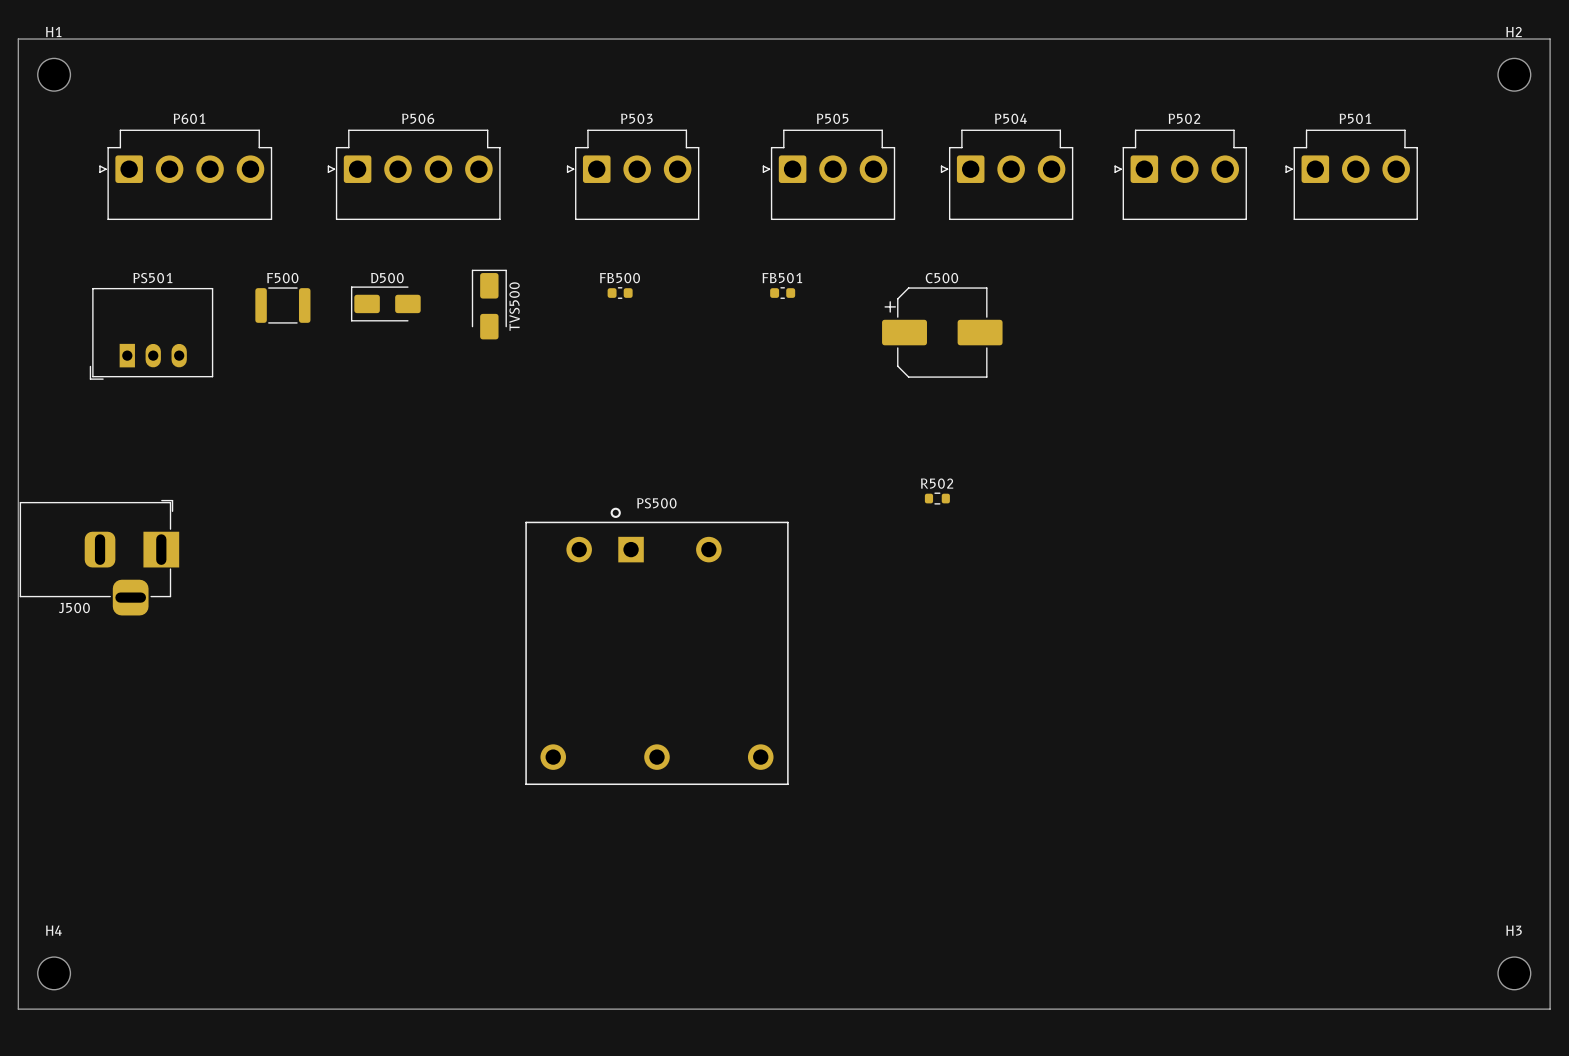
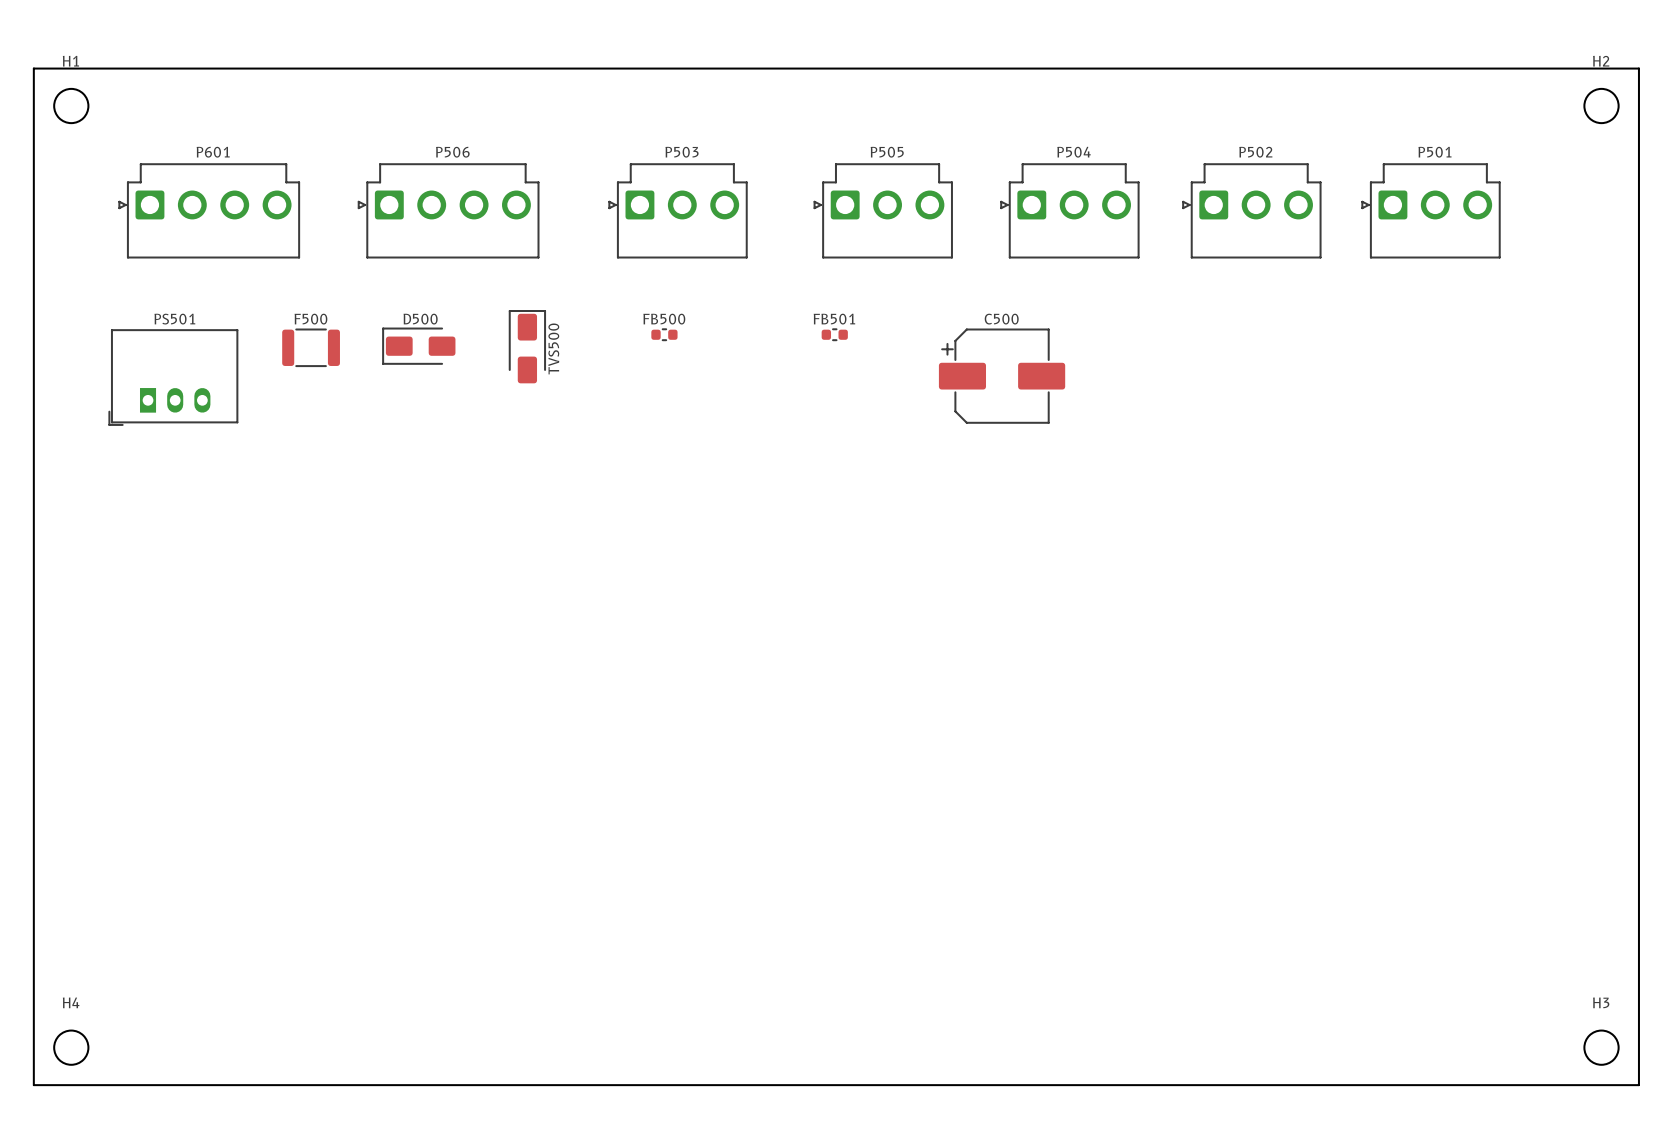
R502: (937, 498) -> none
J500: (99, 557) -> none
PS500: (656, 646) -> none

